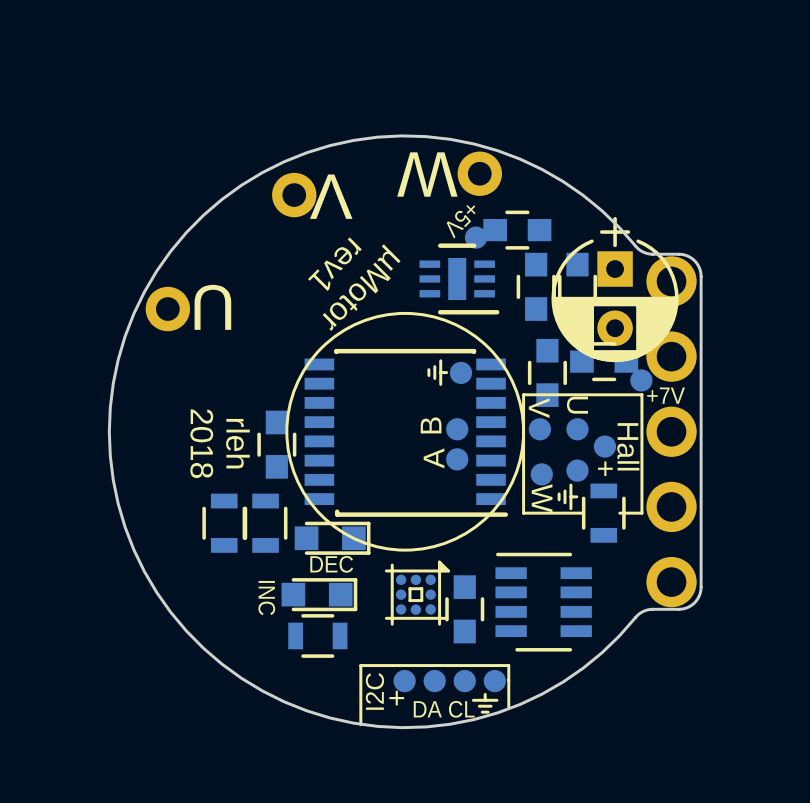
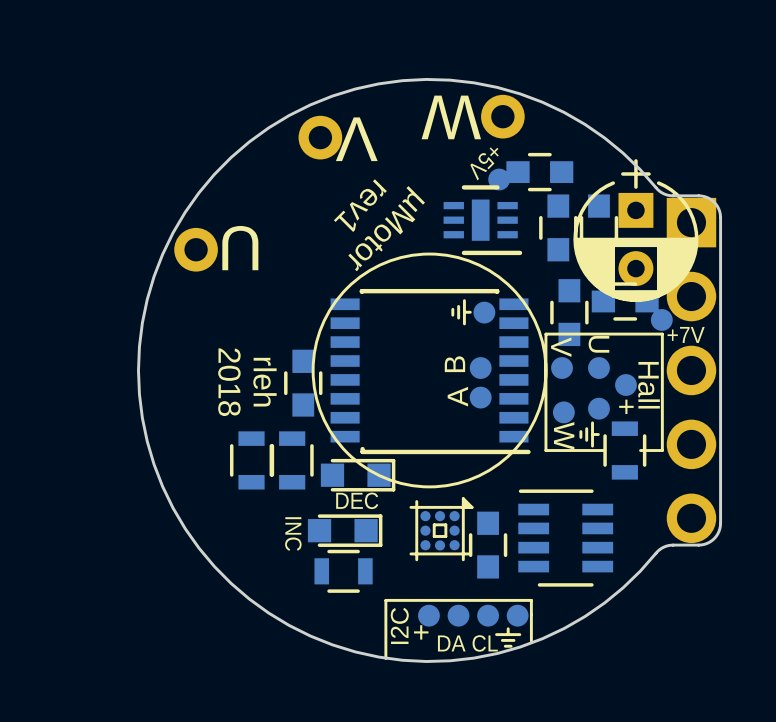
part footprint: [646, 256, 697, 608] -> [666, 197, 717, 544]

